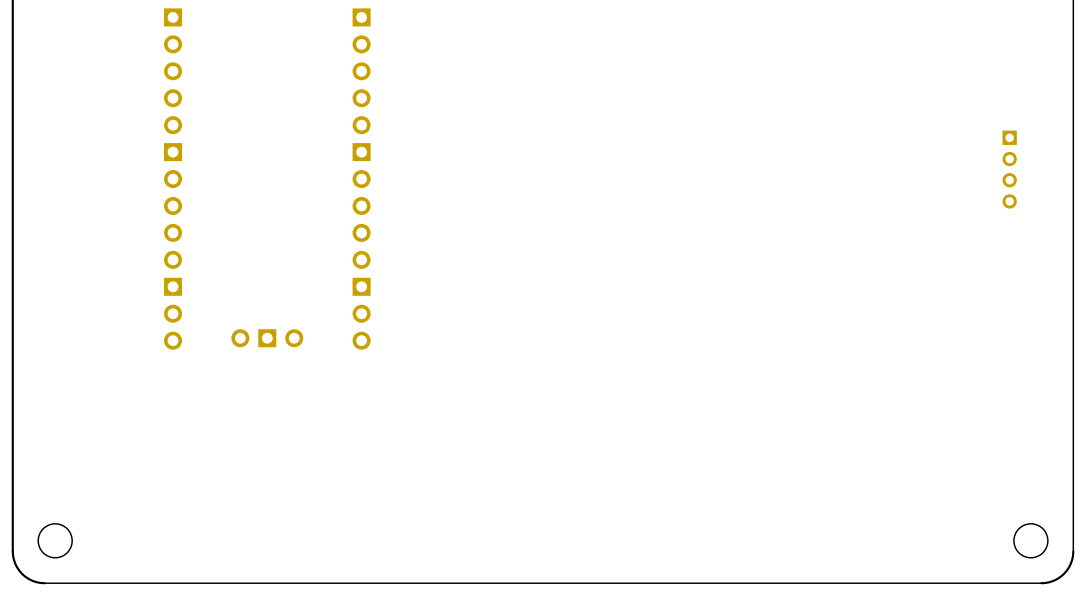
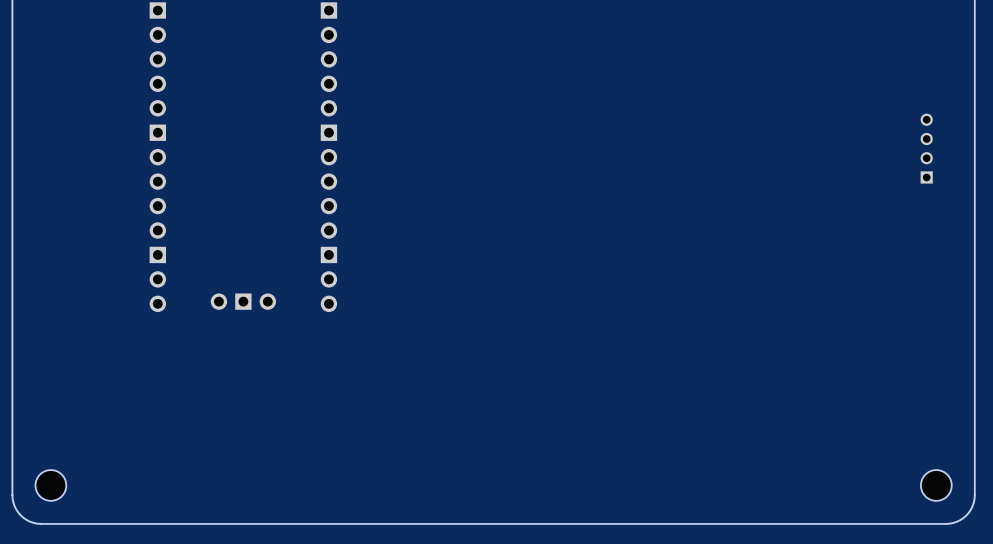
part footprint: [1002, 130, 1017, 209] -> [920, 113, 933, 184]

